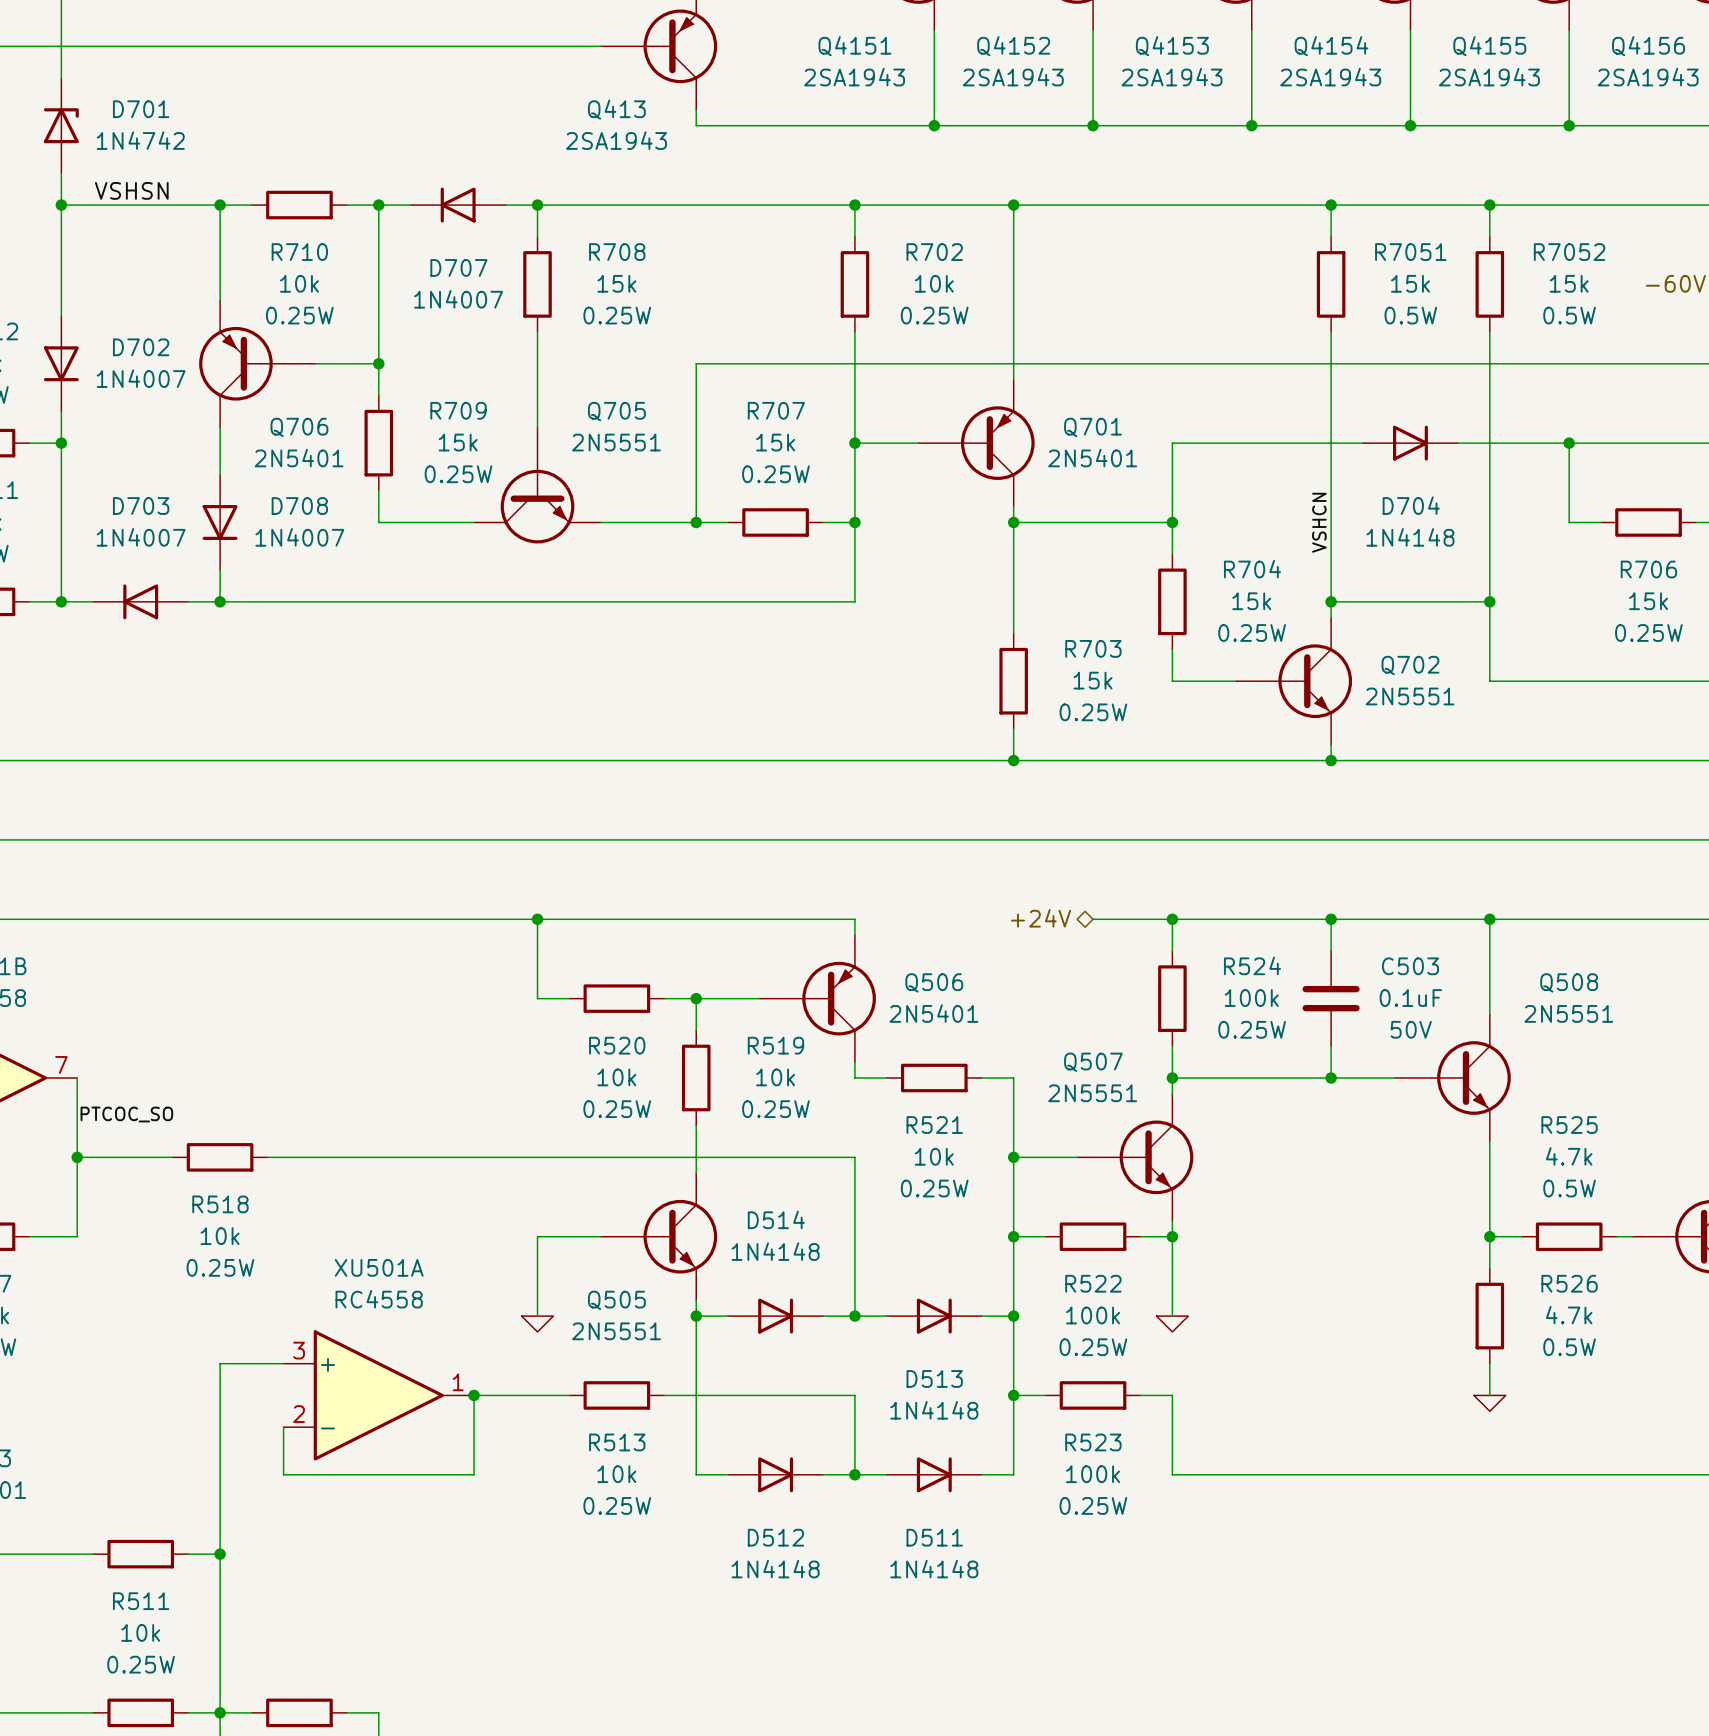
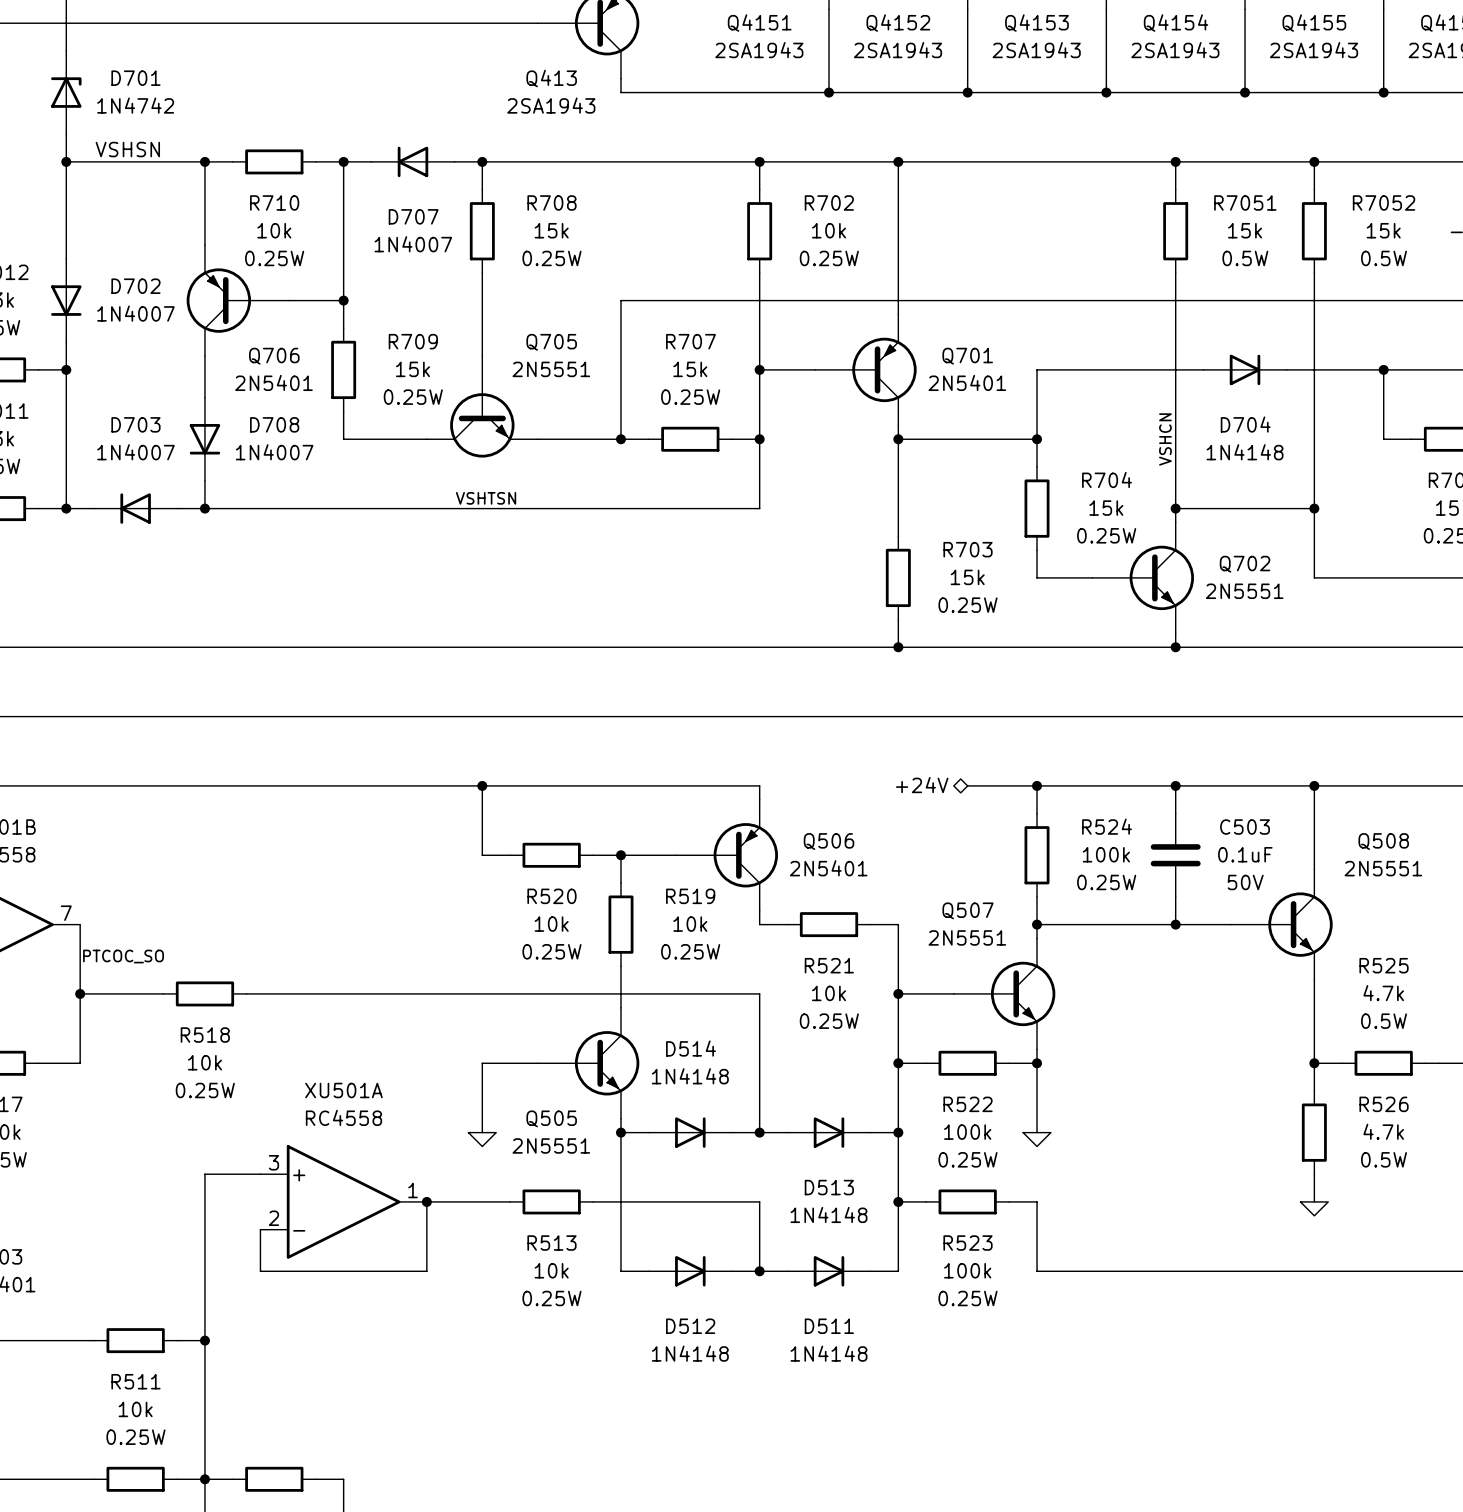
label: none -> VSHTSN (486, 498)

